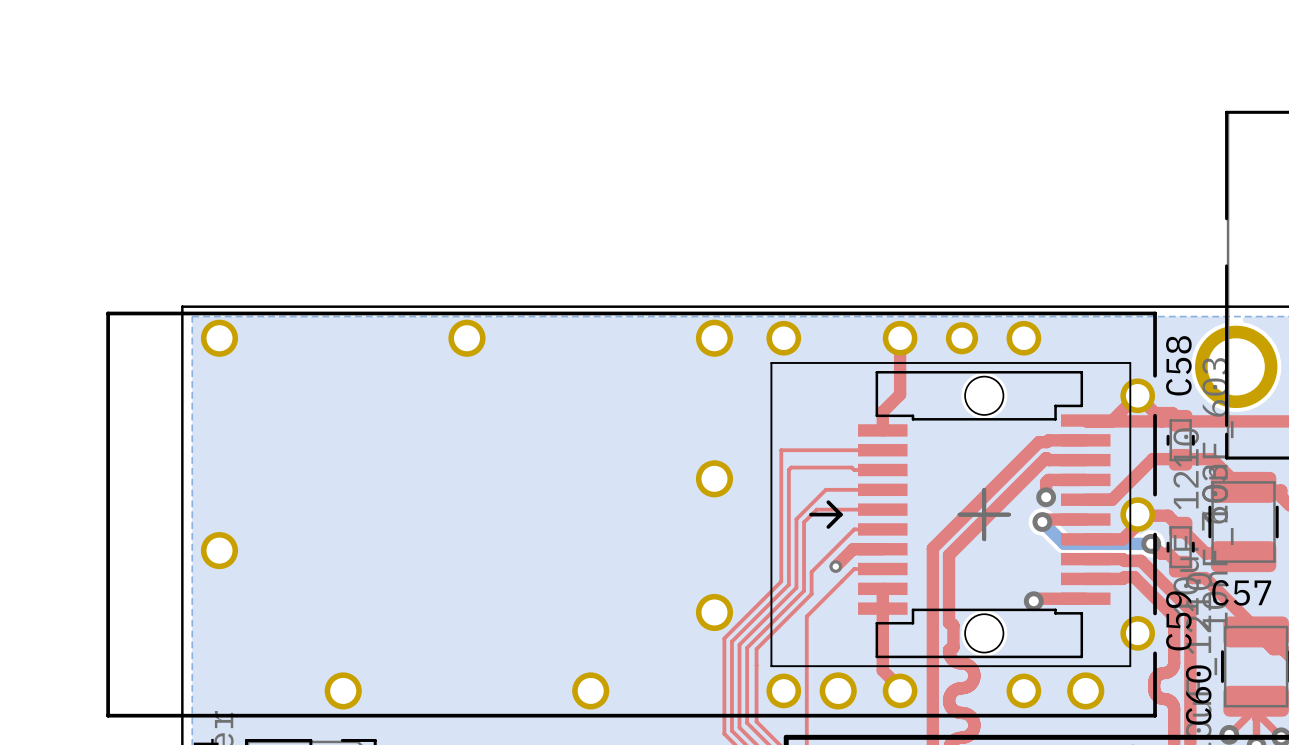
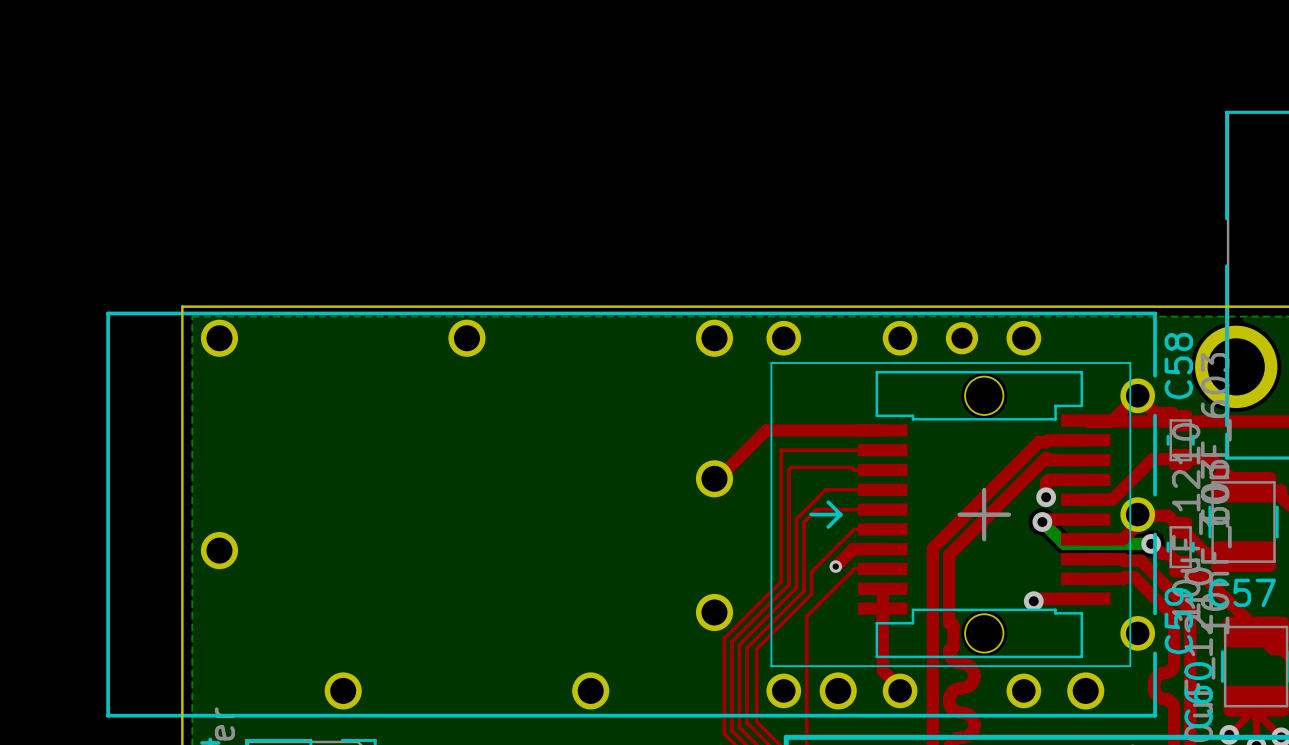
top track: (900, 338) (900, 394) (882, 411) (882, 430) -> (715, 481) (766, 430) (882, 430)

